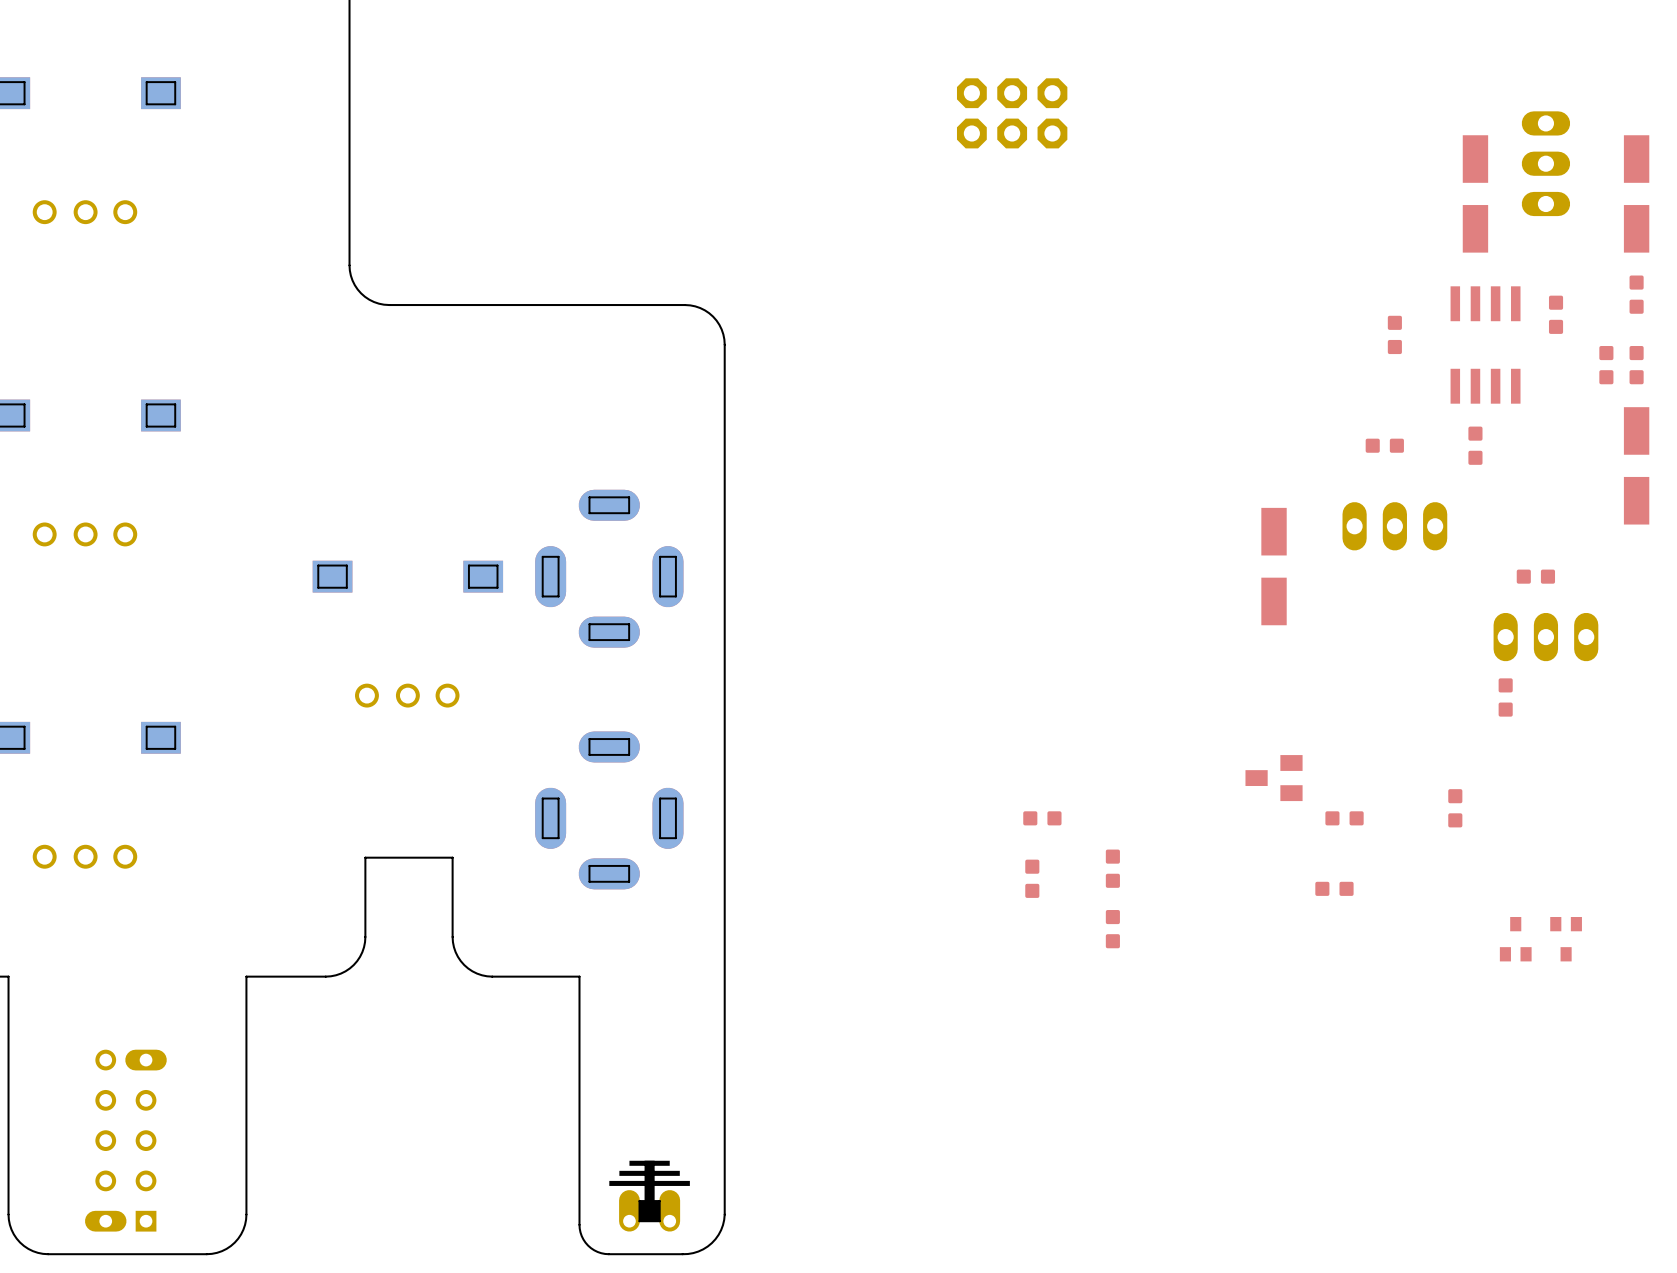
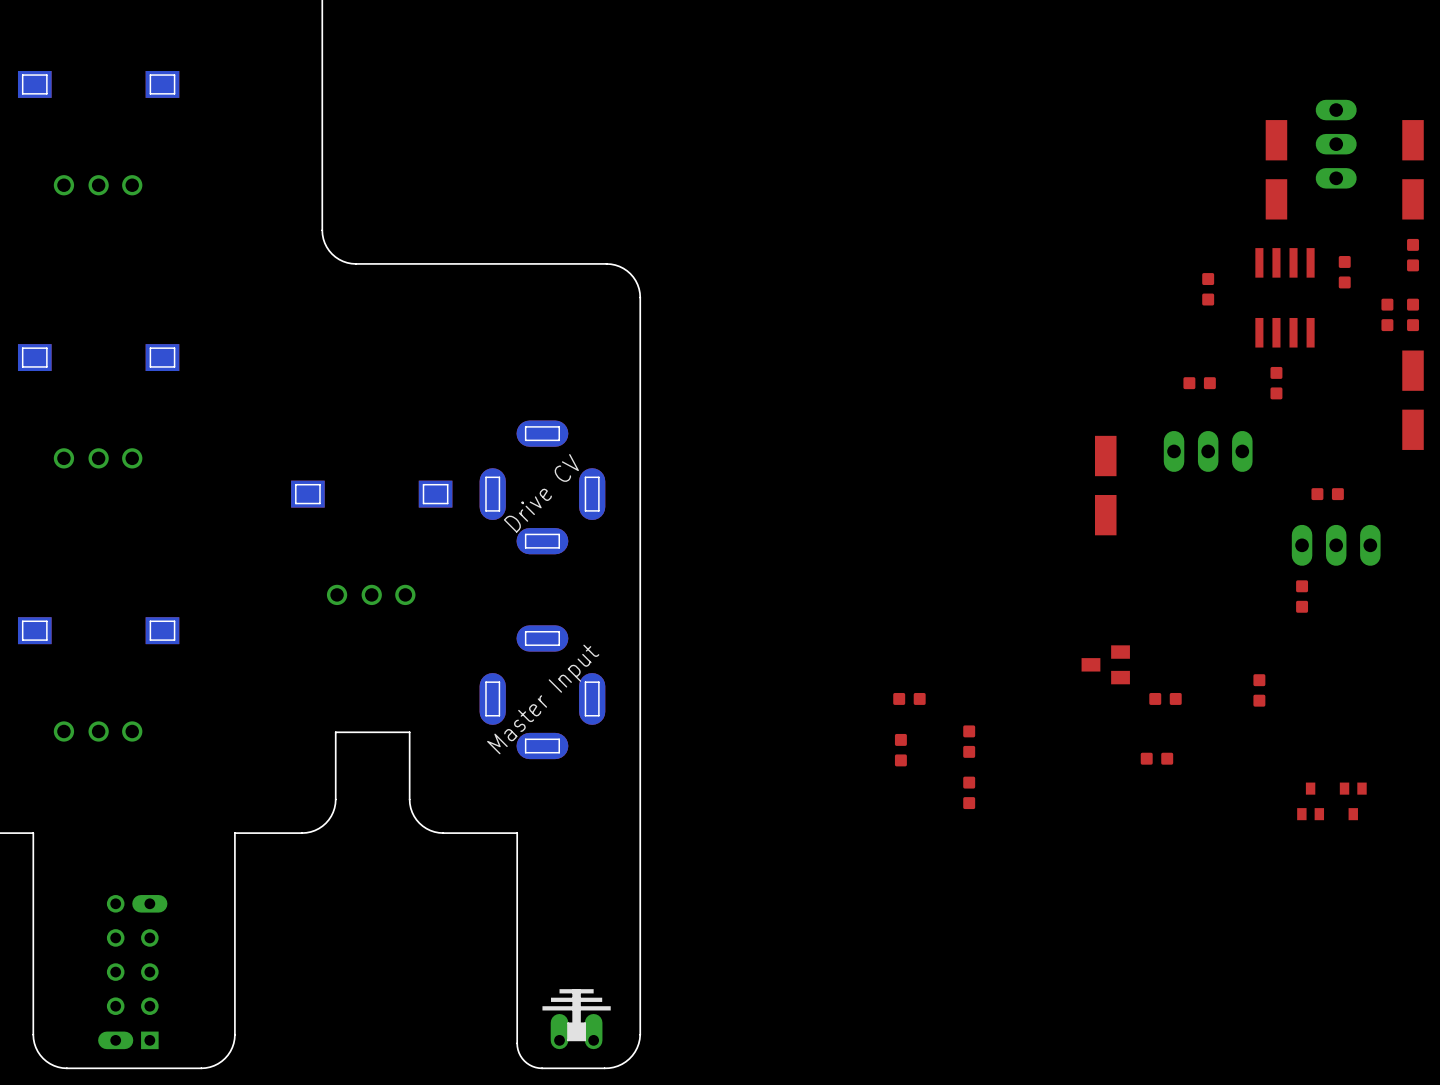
part: (1012, 113) -> none
part text: none -> Drive CV (541, 493)
part text: none -> Master Input (543, 699)

